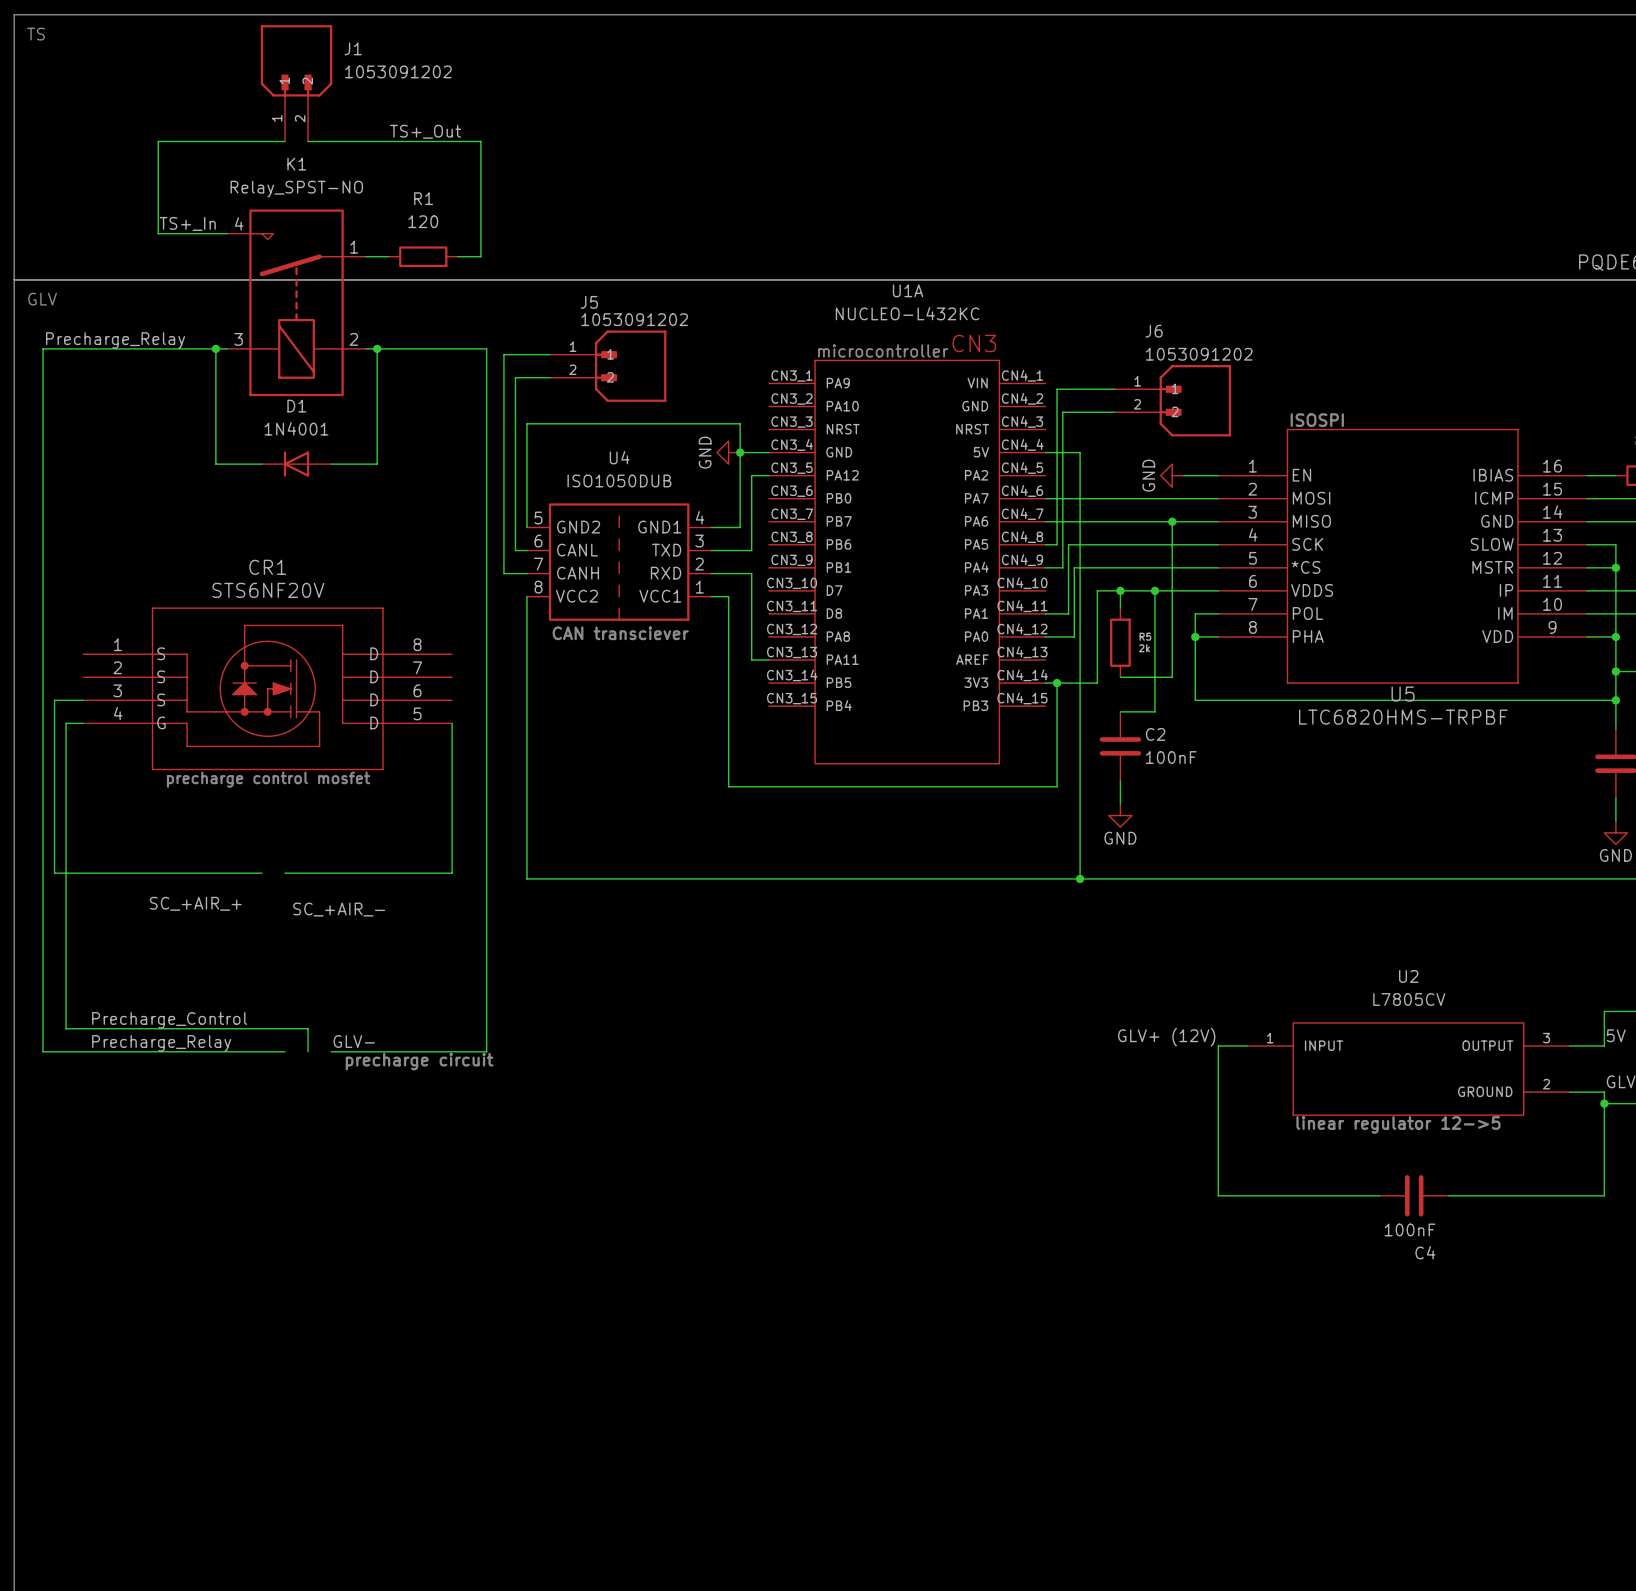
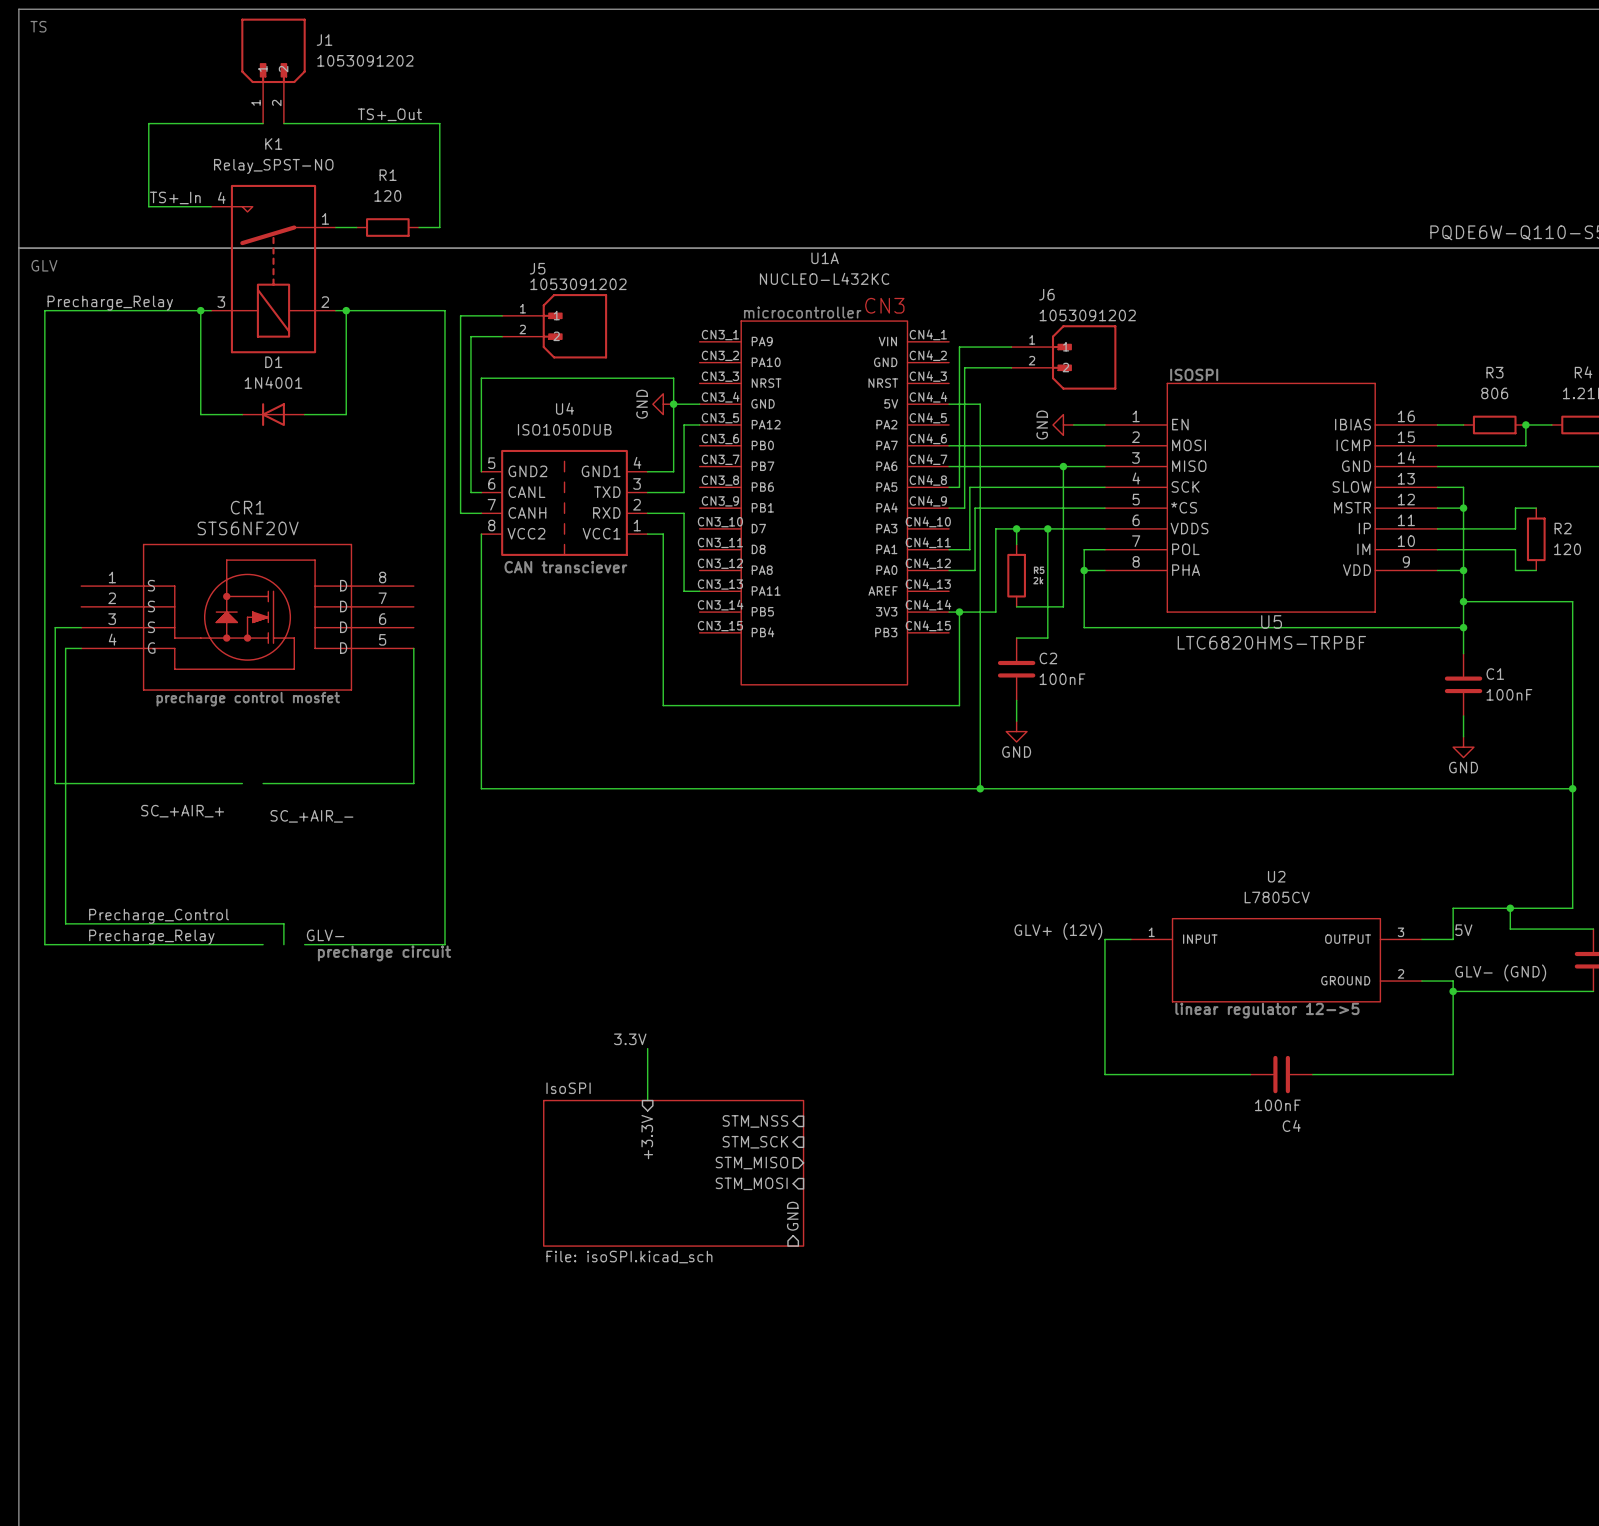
label: none -> 3.3V (630, 1039)
wire: none -> (647, 1048) (647, 1100)
sheet pin: none -> STM_NSS (755, 1121)
sheet pin: none -> +3.3V (647, 1137)
sheet pin: none -> STM_SCK (755, 1142)
sheet pin: none -> STM_MISO (751, 1163)
sheet IsoSPI: none -> File: isoSPI.kicad_sch (673, 1173)
sheet pin: none -> STM_MOSI (751, 1183)
sheet pin: none -> GND (792, 1216)

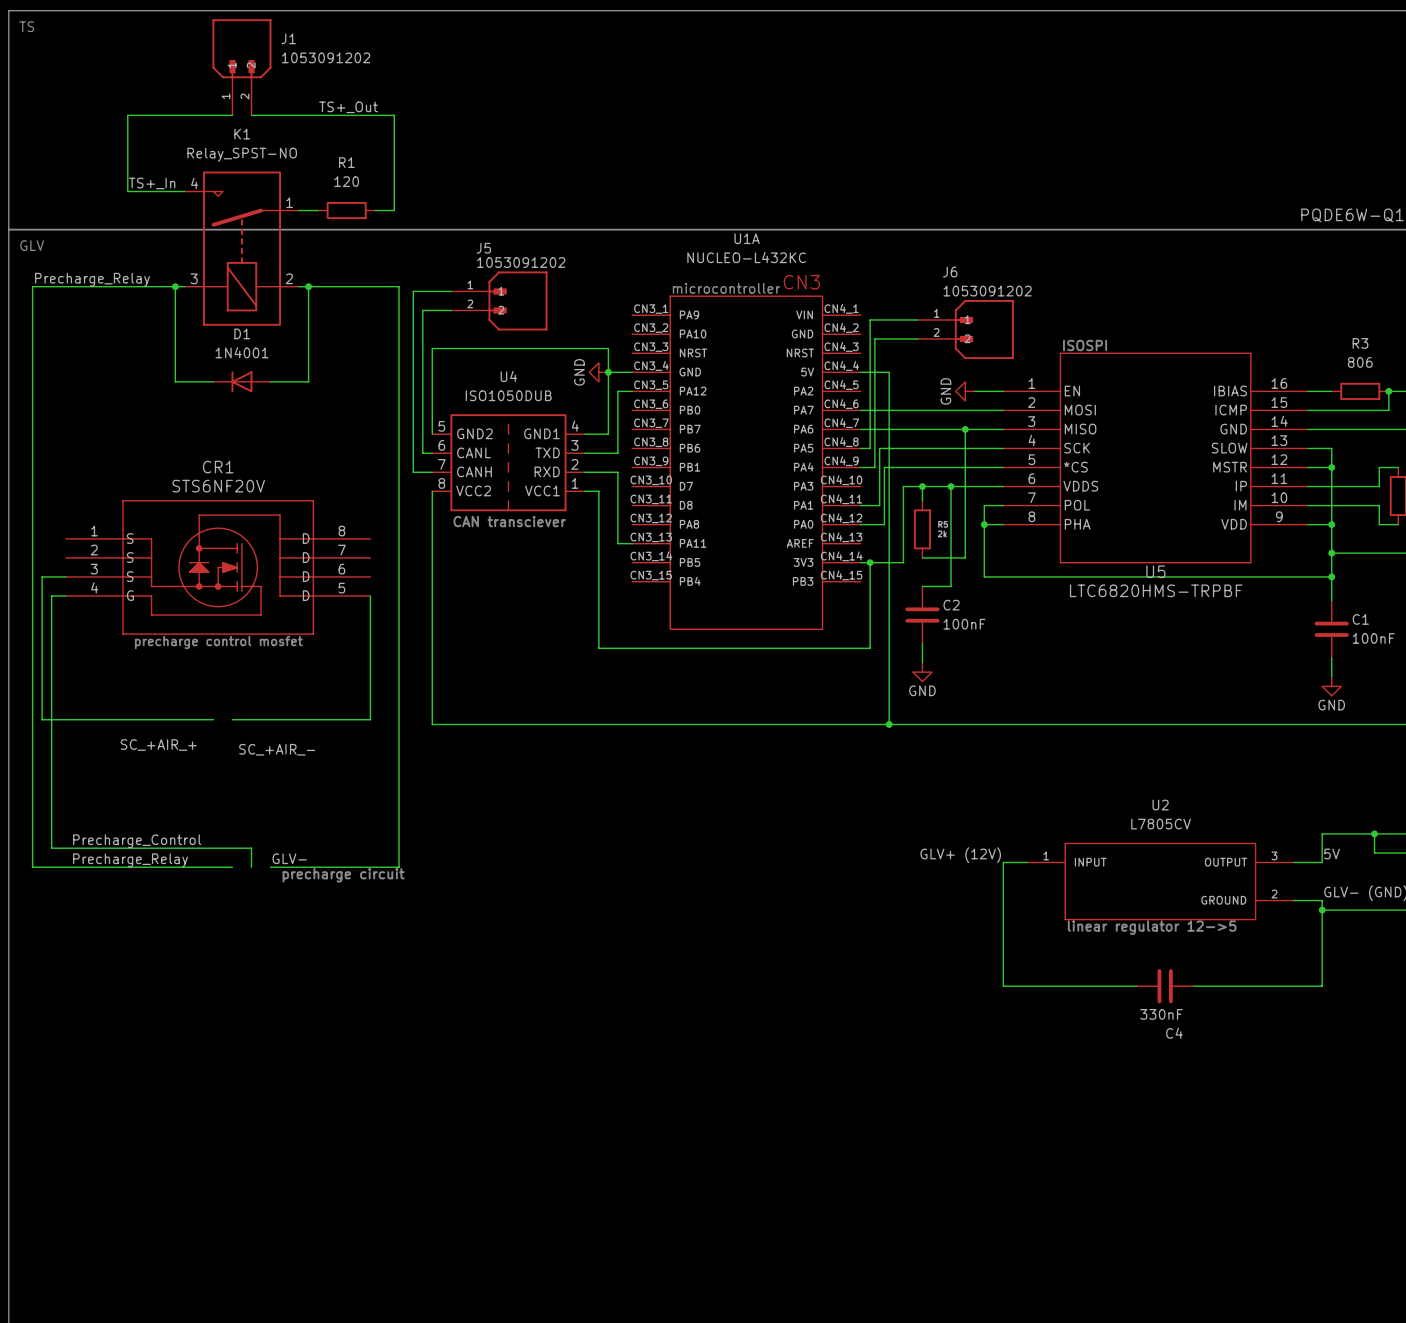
label: 3.3V (630, 1039) -> none
wire: (647, 1048) (647, 1100) -> none
C4 value: 100nF (1277, 1105) -> 330nF (1161, 1014)
sheet pin: STM_NSS (755, 1121) -> none
sheet pin: +3.3V (647, 1137) -> none
sheet pin: STM_SCK (755, 1142) -> none
sheet pin: STM_MISO (751, 1163) -> none
sheet IsoSPI: File: isoSPI.kicad_sch (673, 1173) -> none
sheet pin: STM_MOSI (751, 1183) -> none
sheet pin: GND (792, 1216) -> none

